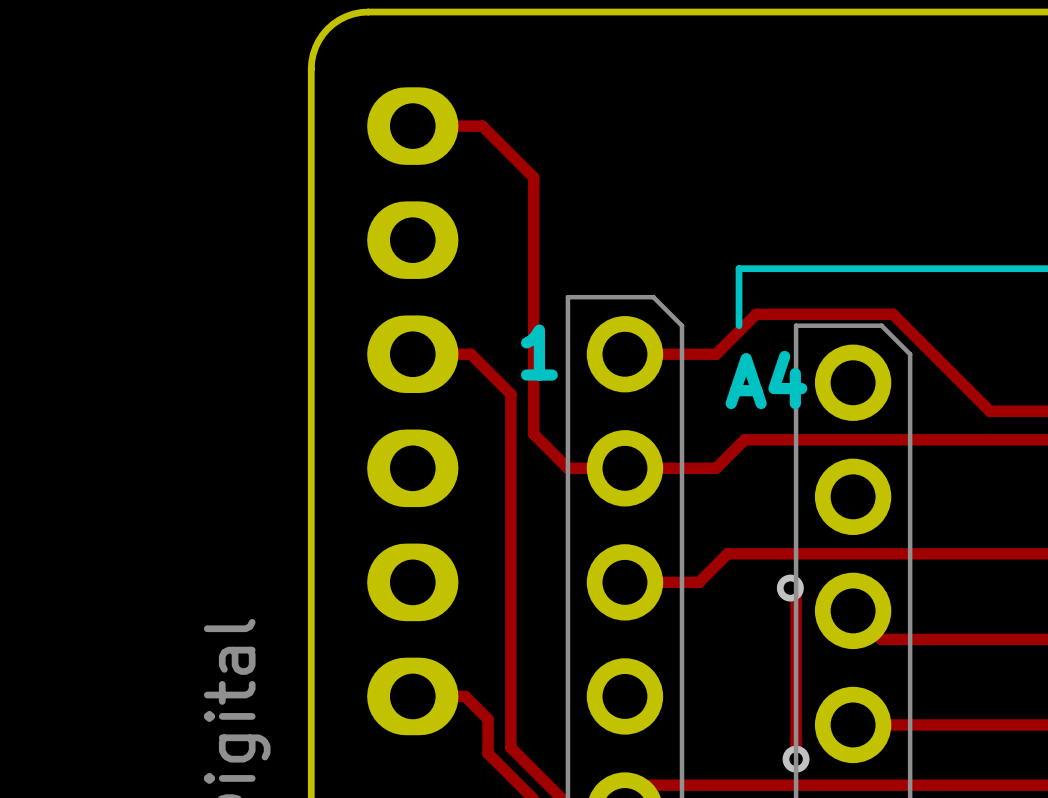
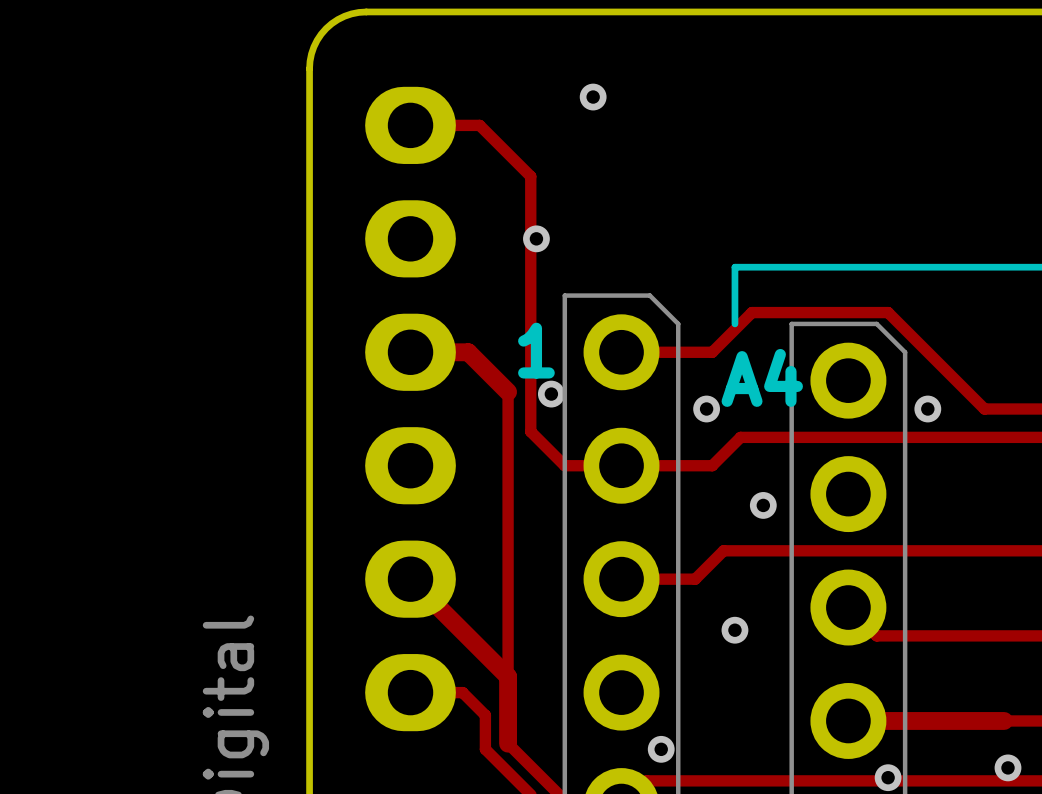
via: none -> (593, 97)
via: none -> (536, 238)
track width: thin (412, 354) (470, 354) (510, 394) -> thick (410, 352) (468, 352) (508, 391)
via: none -> (551, 394)
via: none -> (706, 409)
via: none -> (927, 409)
via: none -> (763, 505)
track: none -> (410, 579) (508, 676)
track: (790, 588) (796, 593) (796, 759) -> none
via: (790, 588) -> none
via: none -> (734, 630)
track width: thin (510, 680) (510, 747) -> thick (508, 676) (508, 743)
track width: thin (853, 724) (1009, 724) -> thick (848, 720) (1004, 720)
via: none -> (661, 749)
via: (796, 759) -> none
via: none -> (1008, 767)
via: none -> (888, 777)

